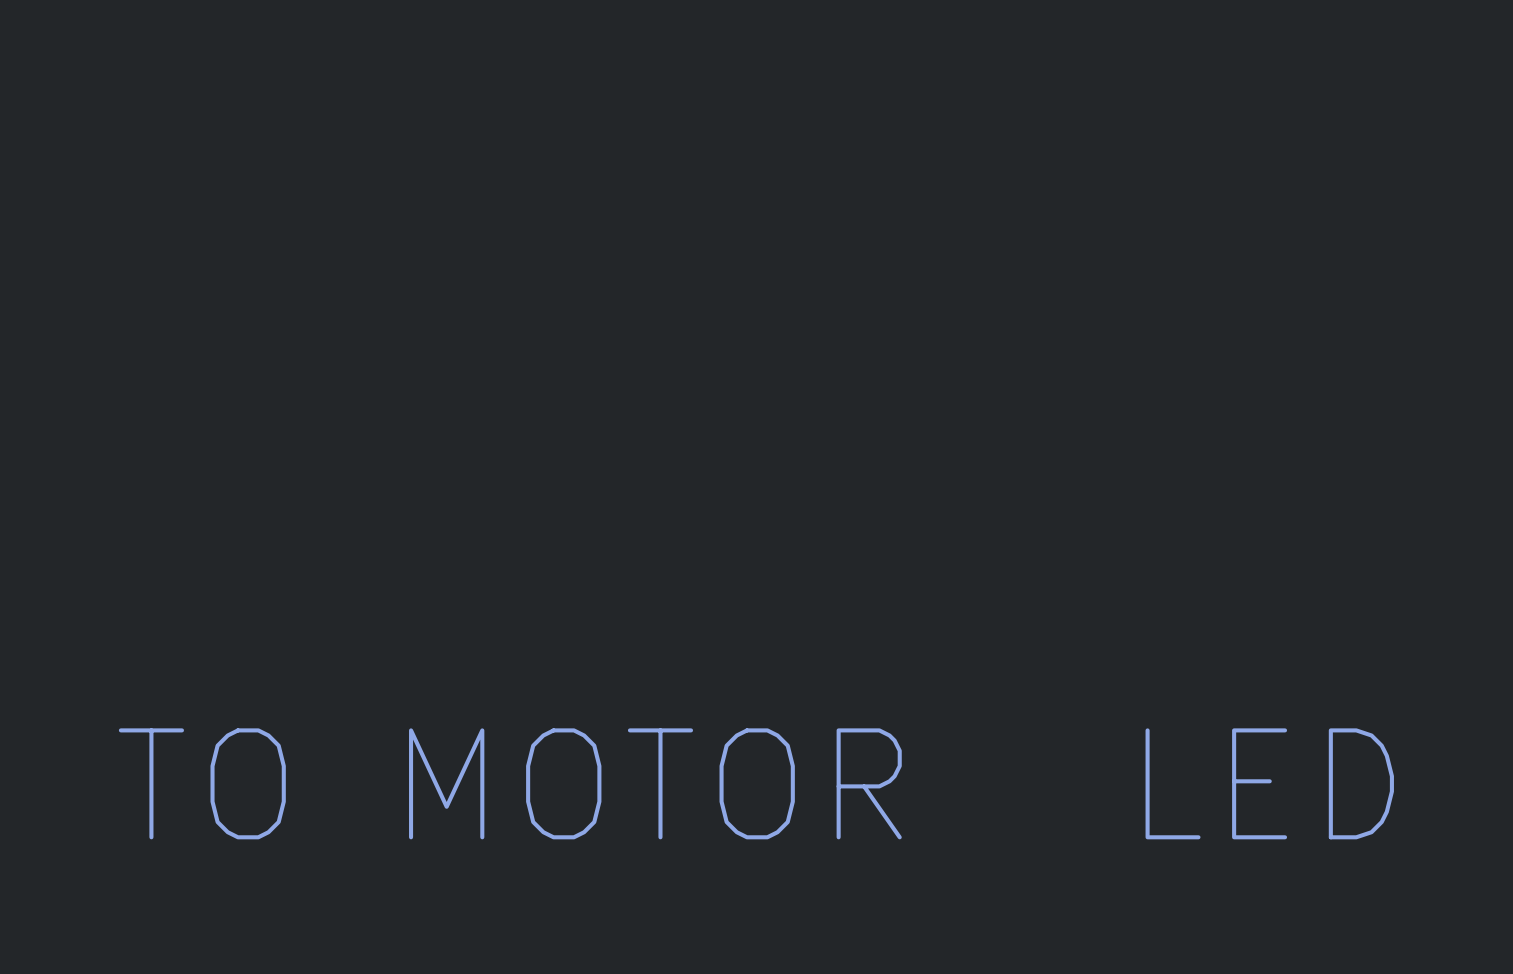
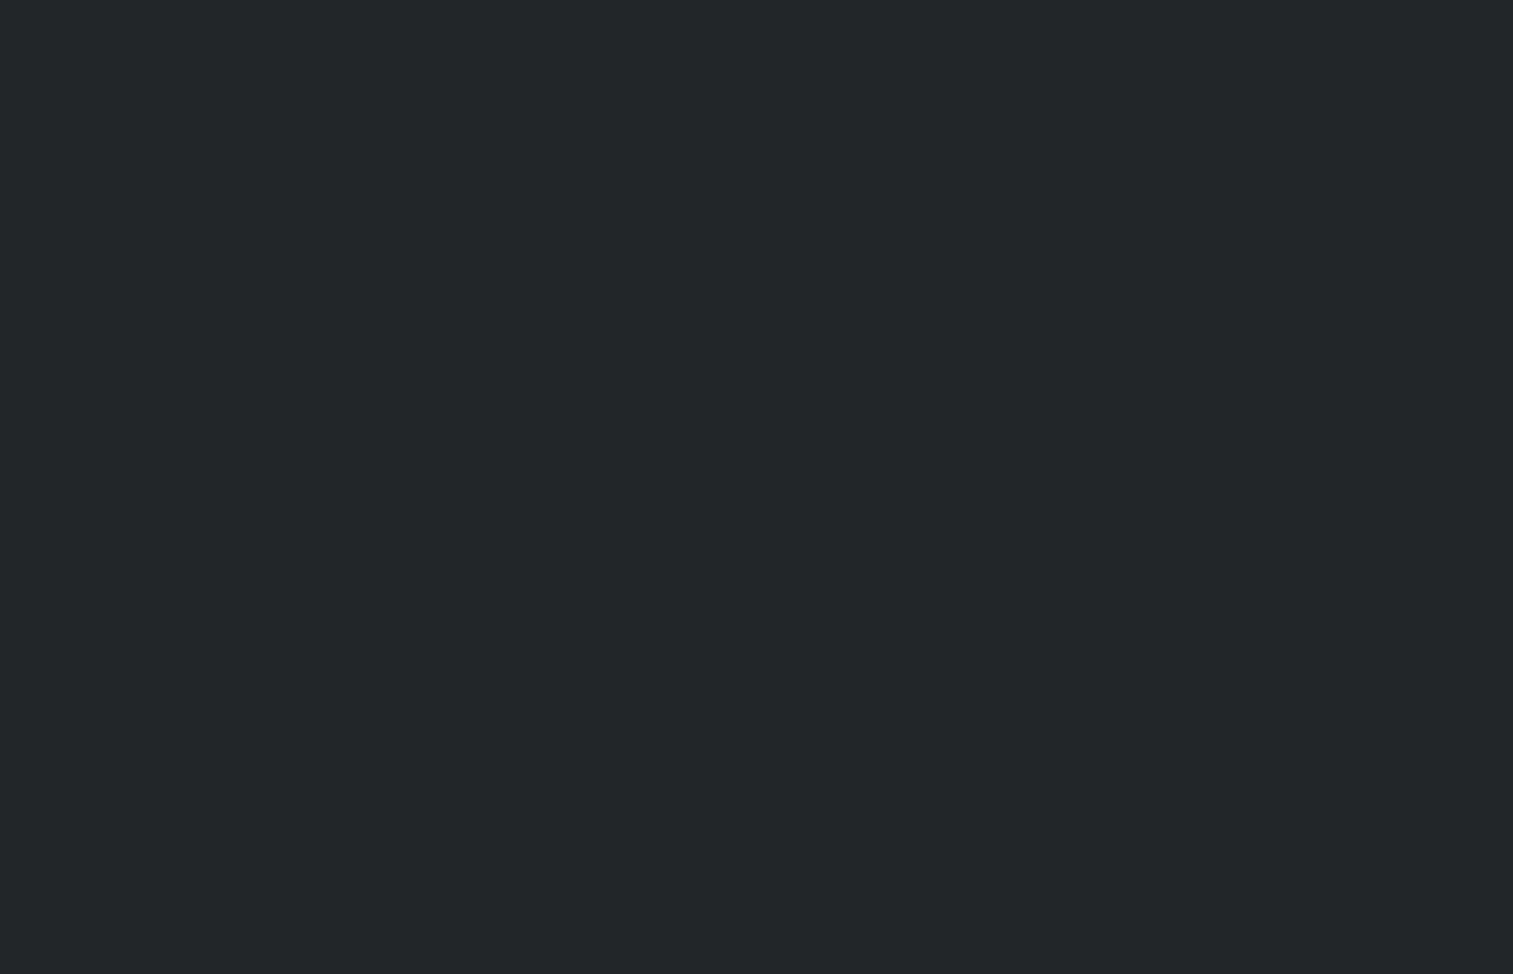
text: TO MOTOR (510, 783) -> none
text: LED (1269, 783) -> none

